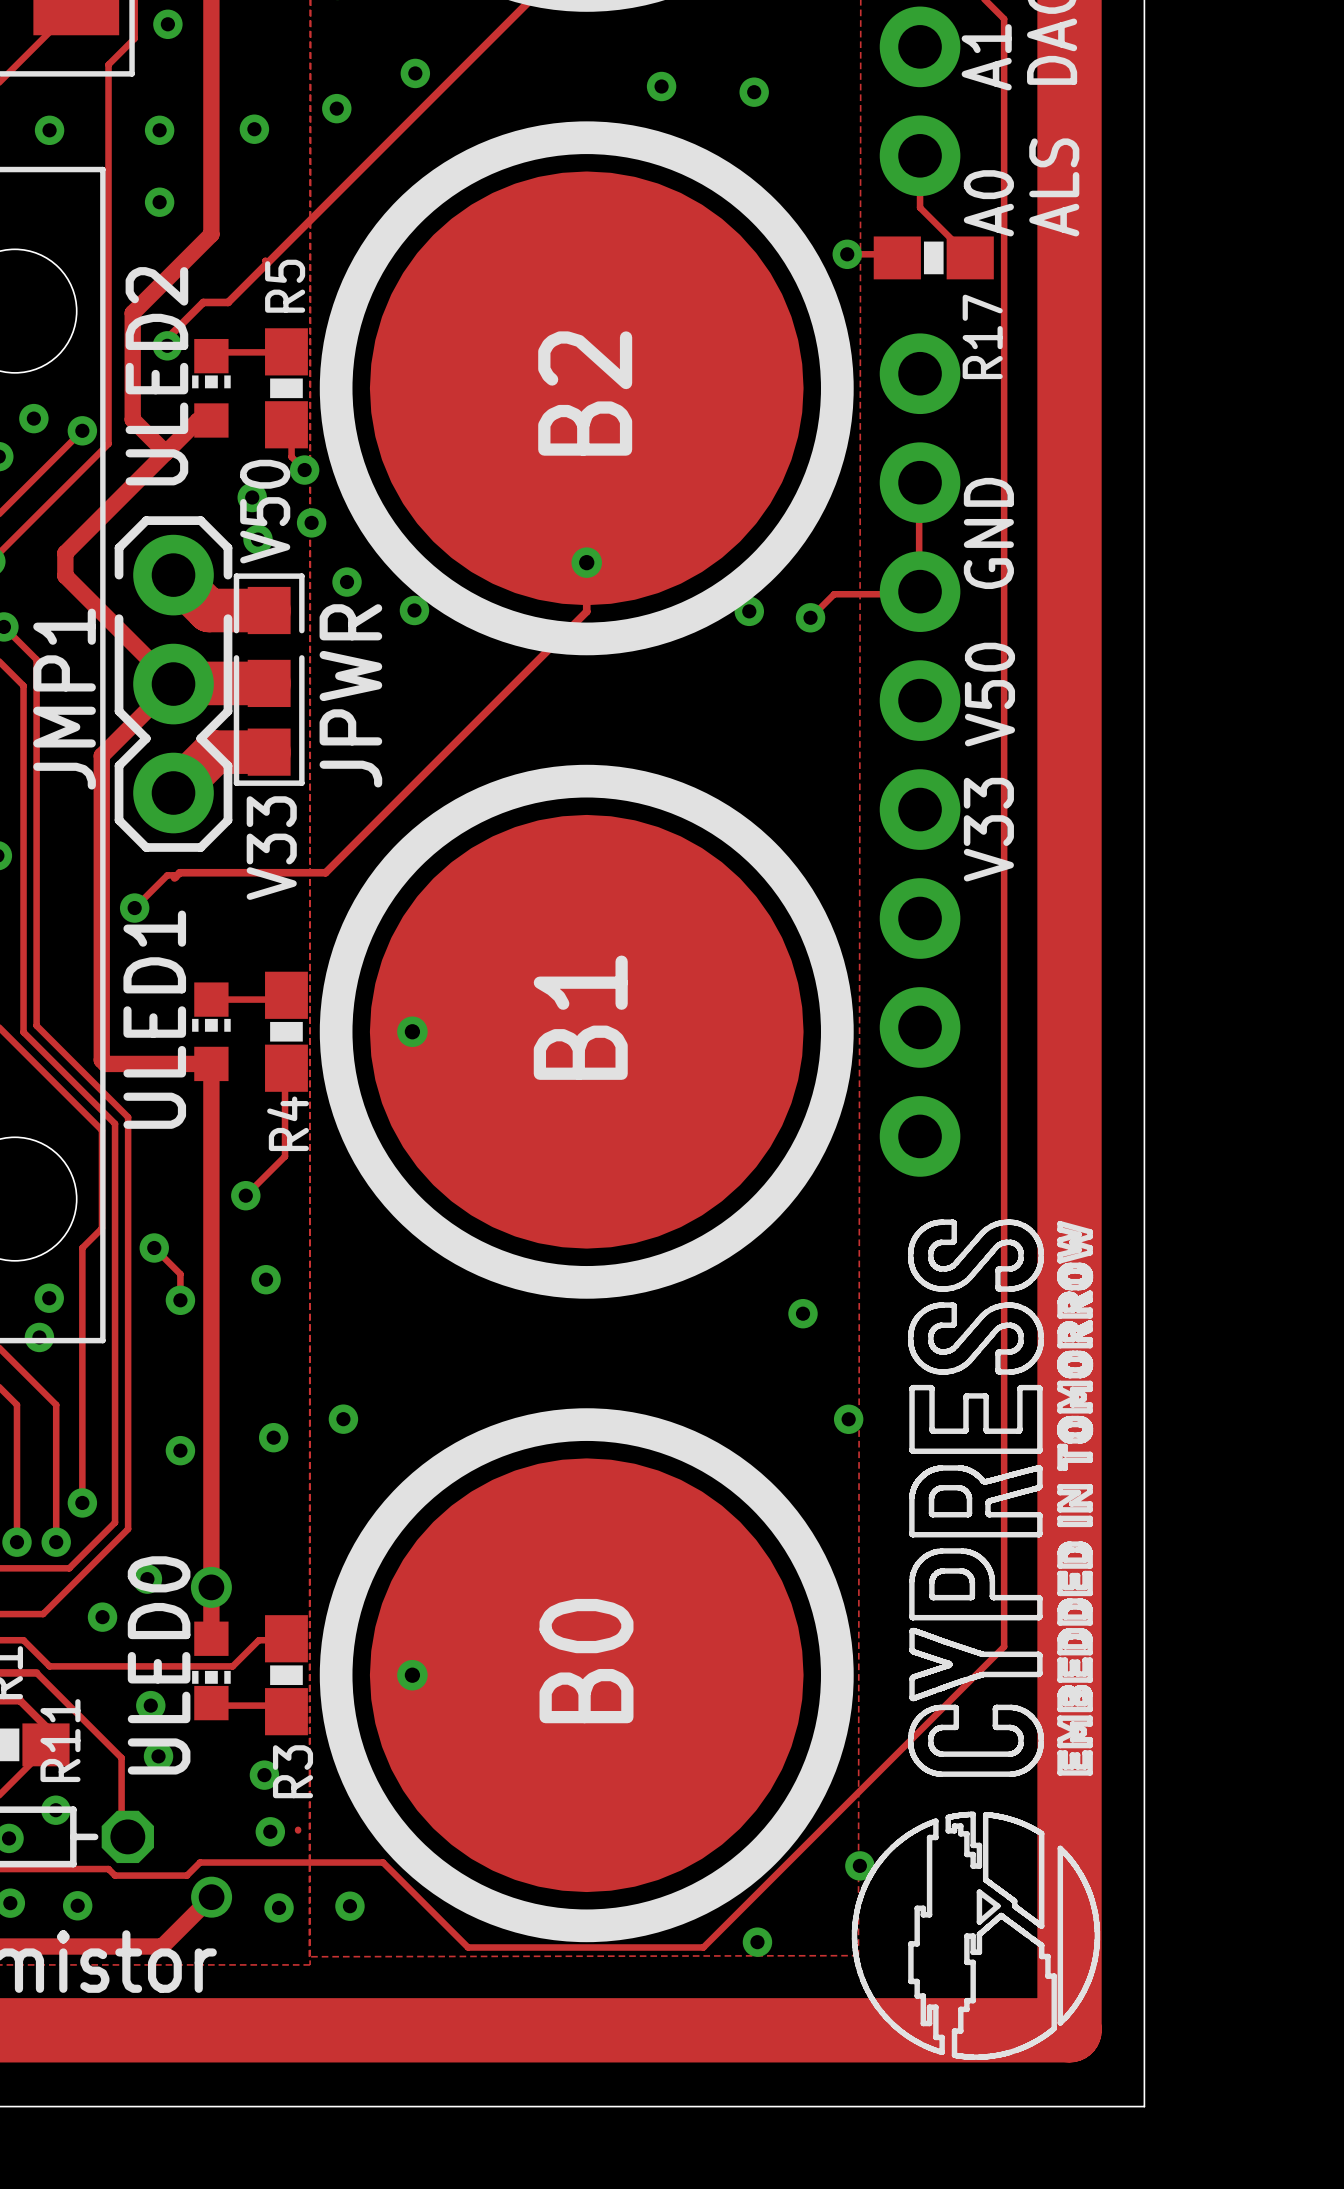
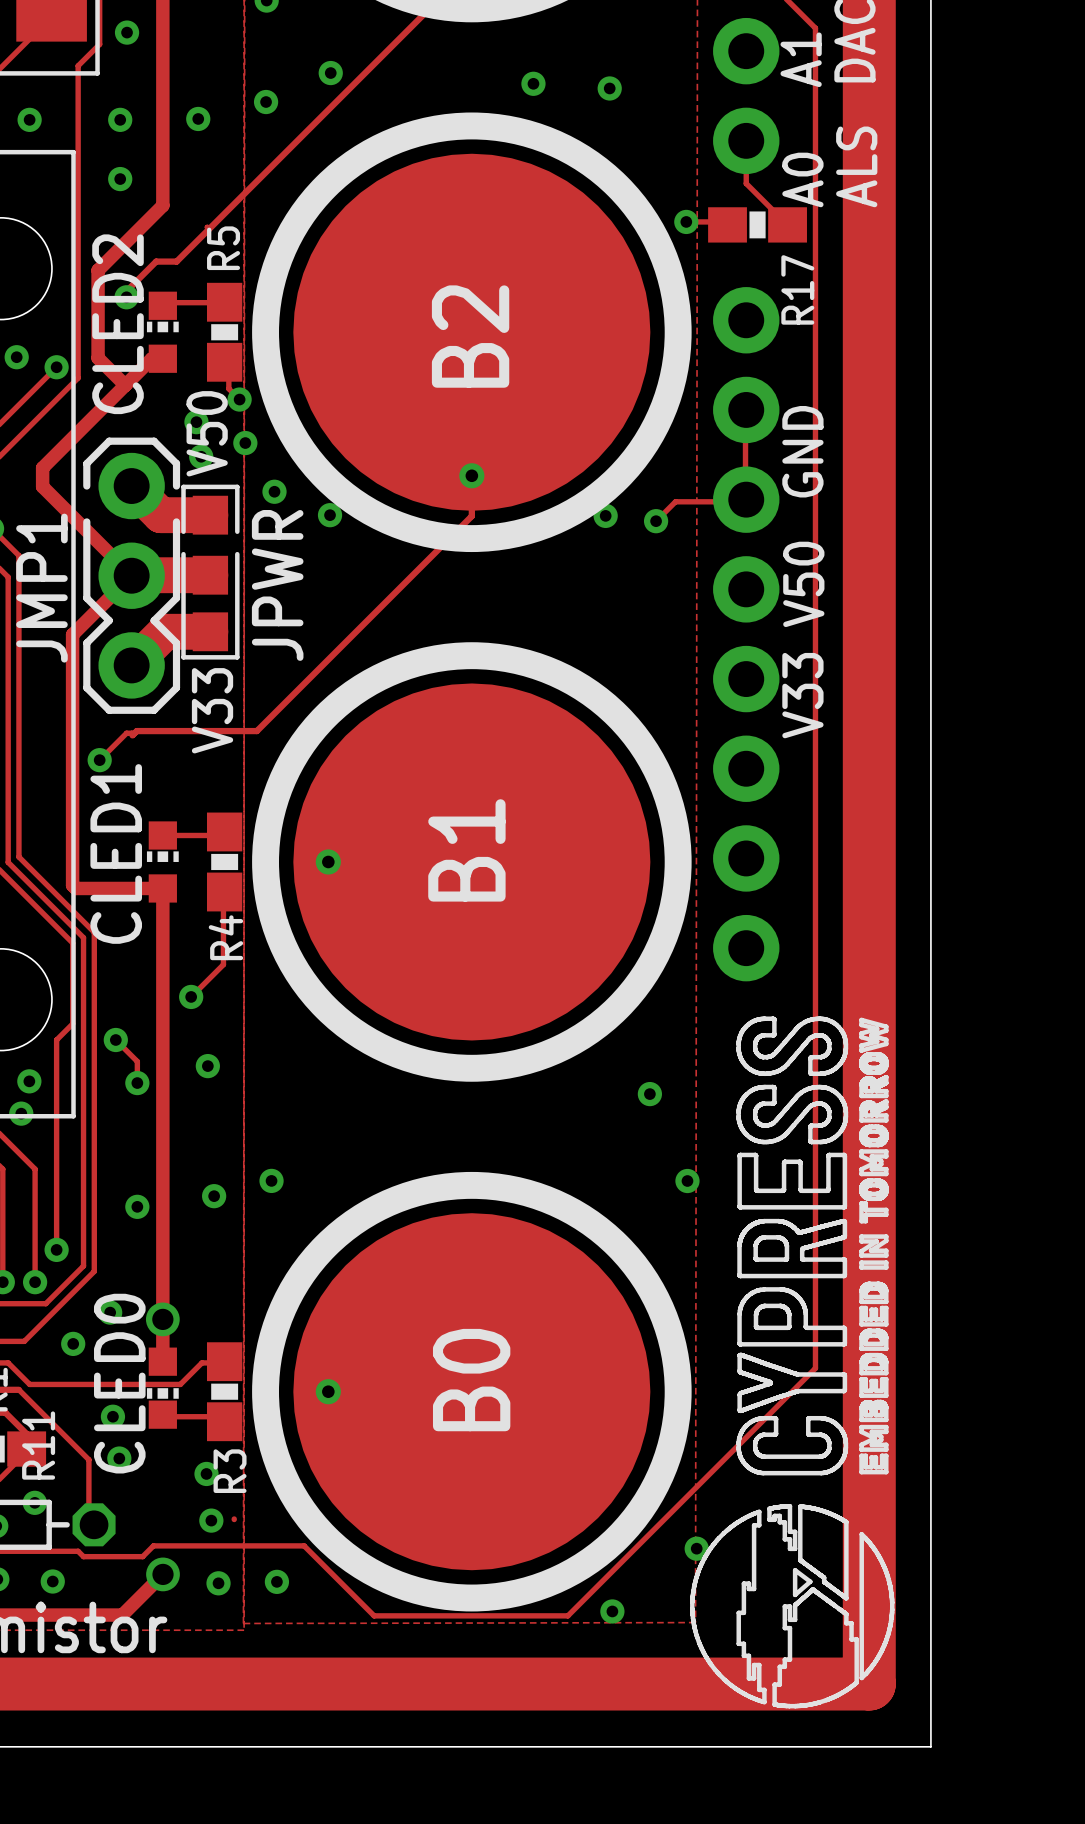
ULED2 name: ULED2 (156, 376) -> CLED2 (118, 324)
ULED1 name: ULED1 (154, 1019) -> CLED1 (116, 853)
ULED0 name: ULED0 (159, 1665) -> CLED0 (119, 1383)

